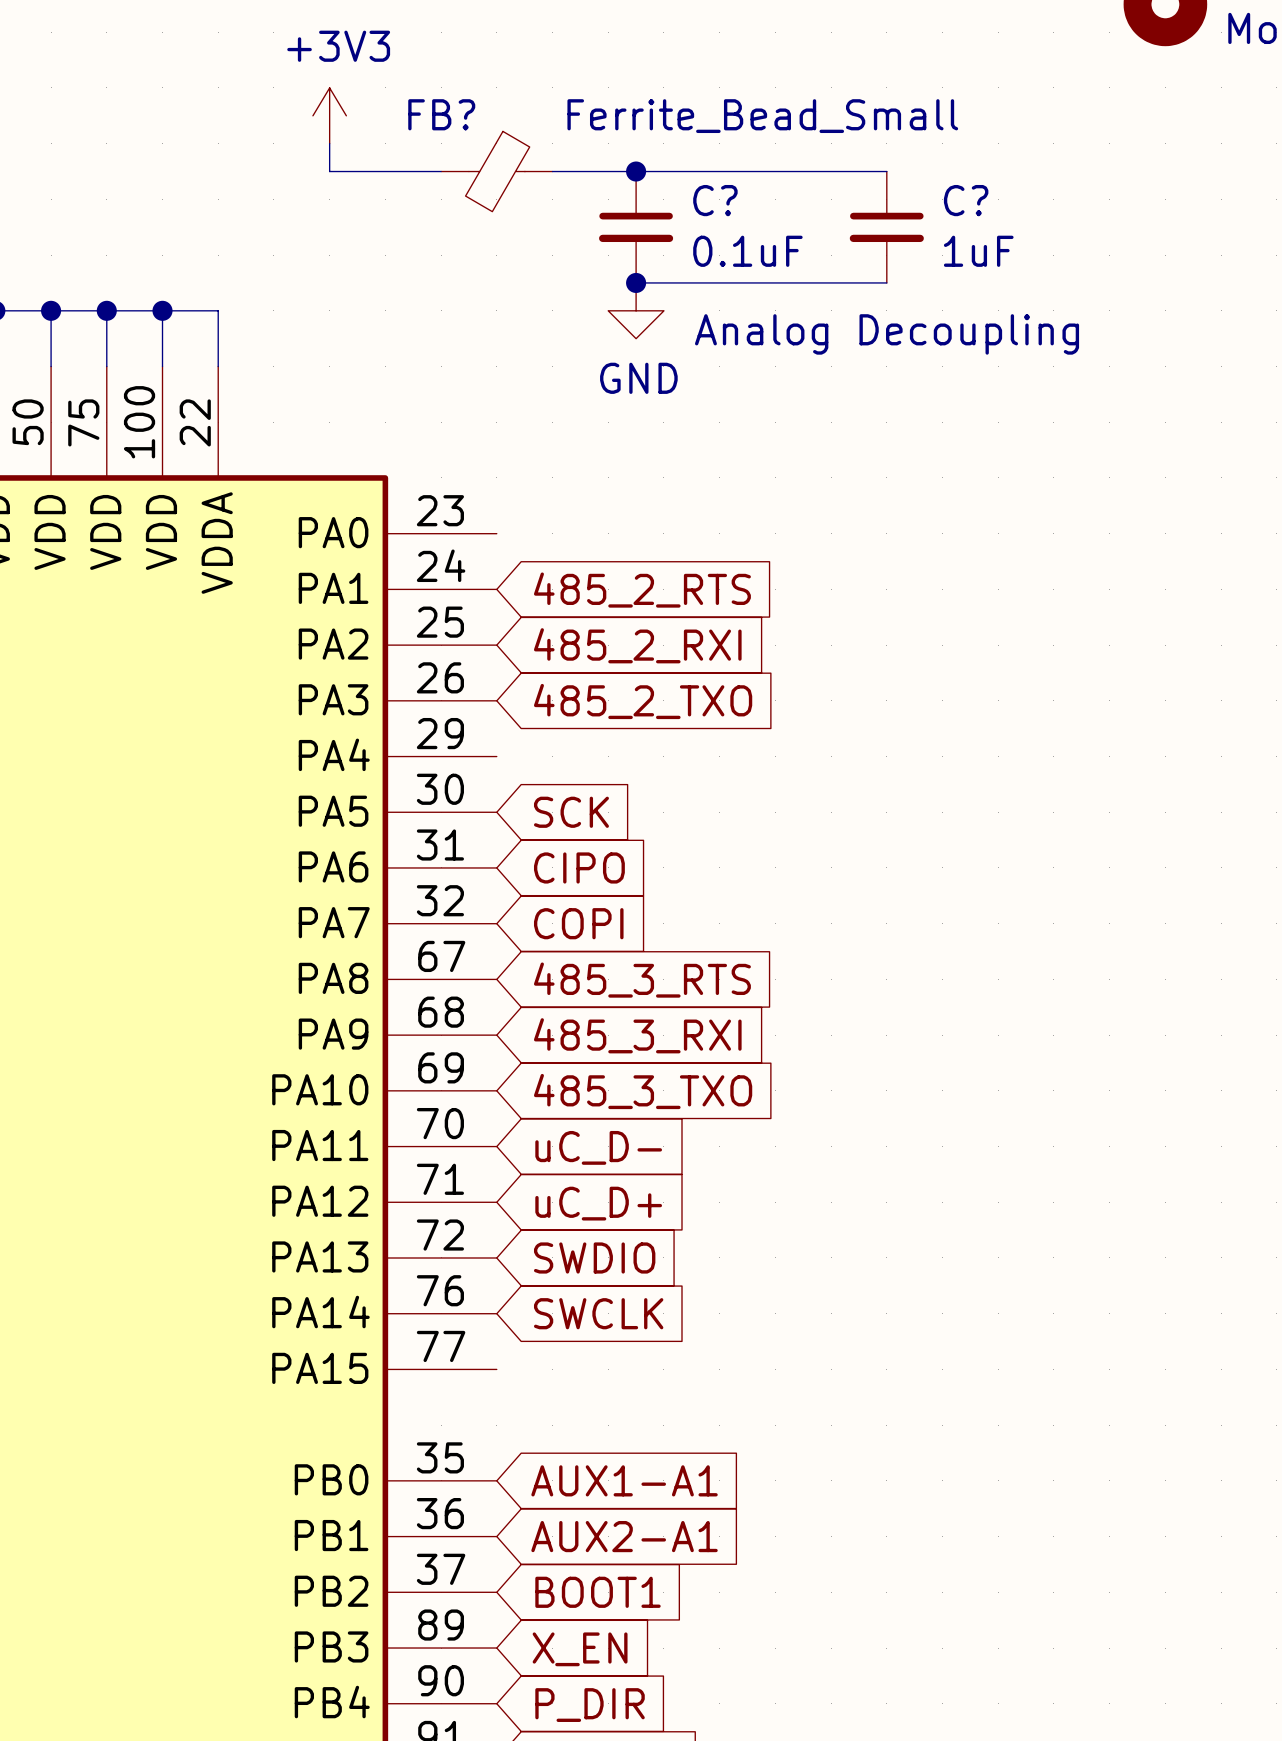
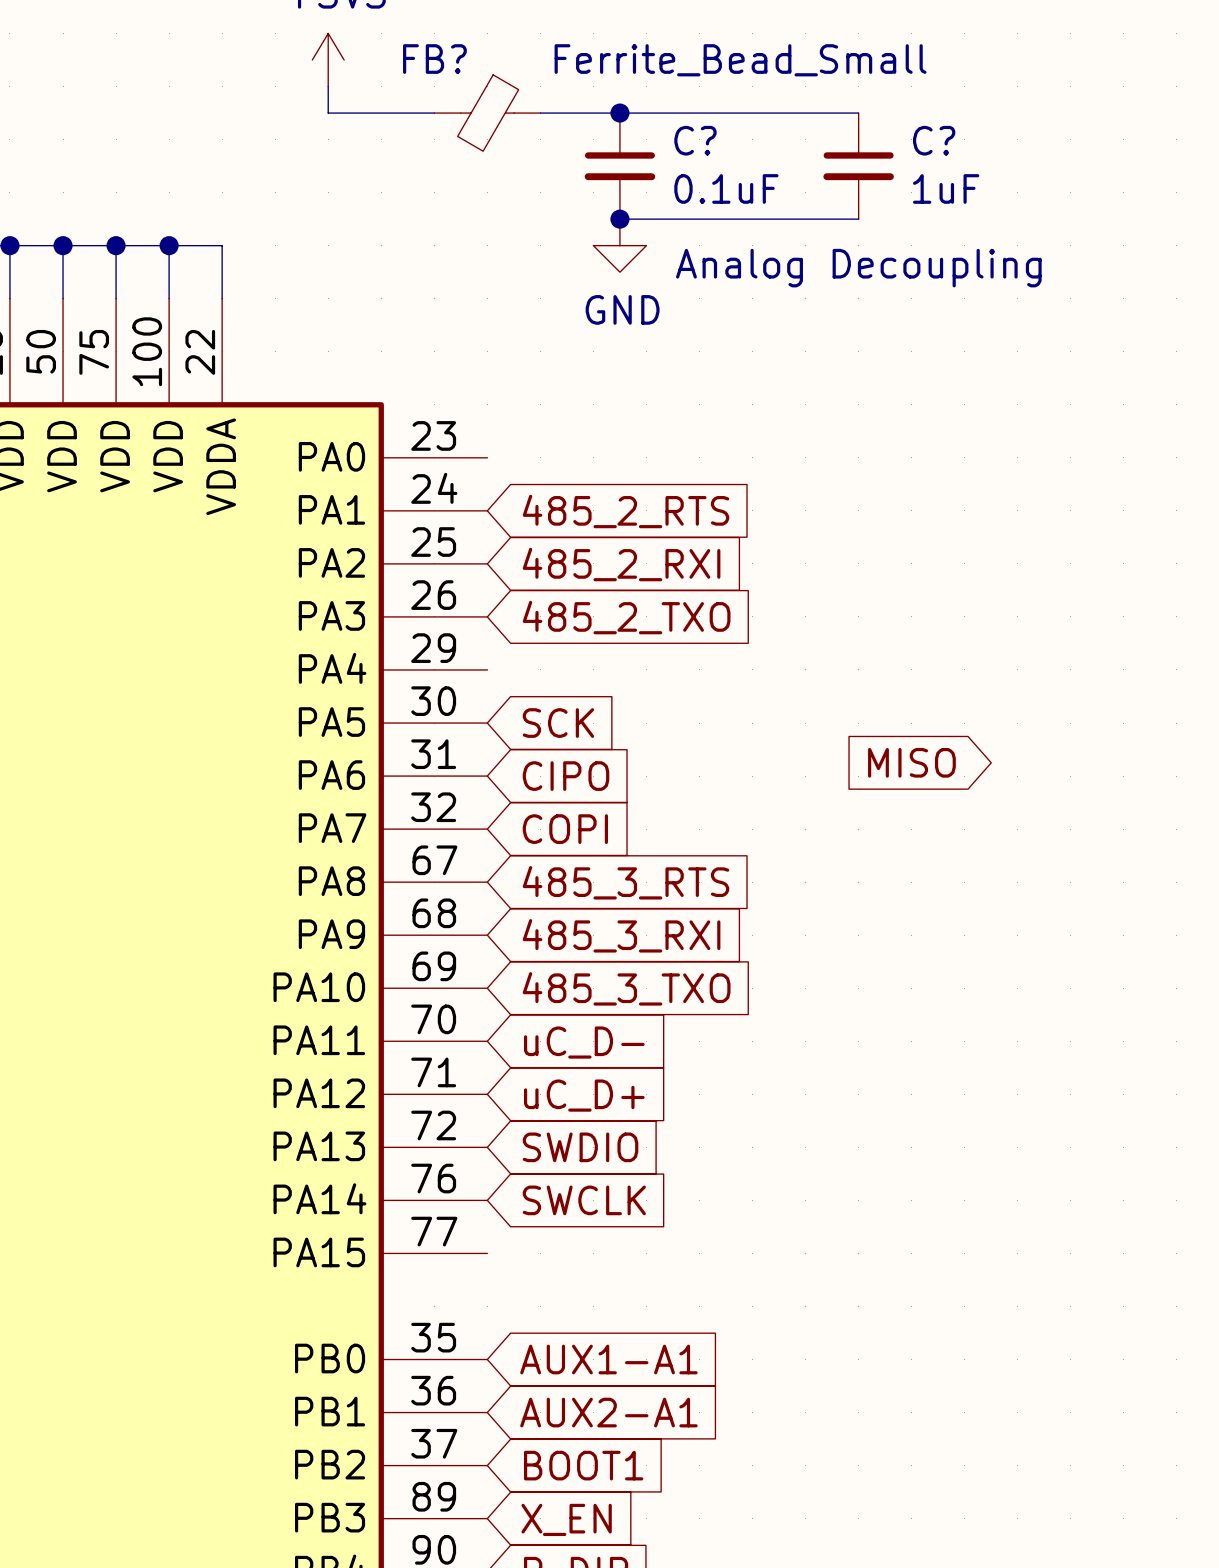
global label: none -> MISO (911, 762)

